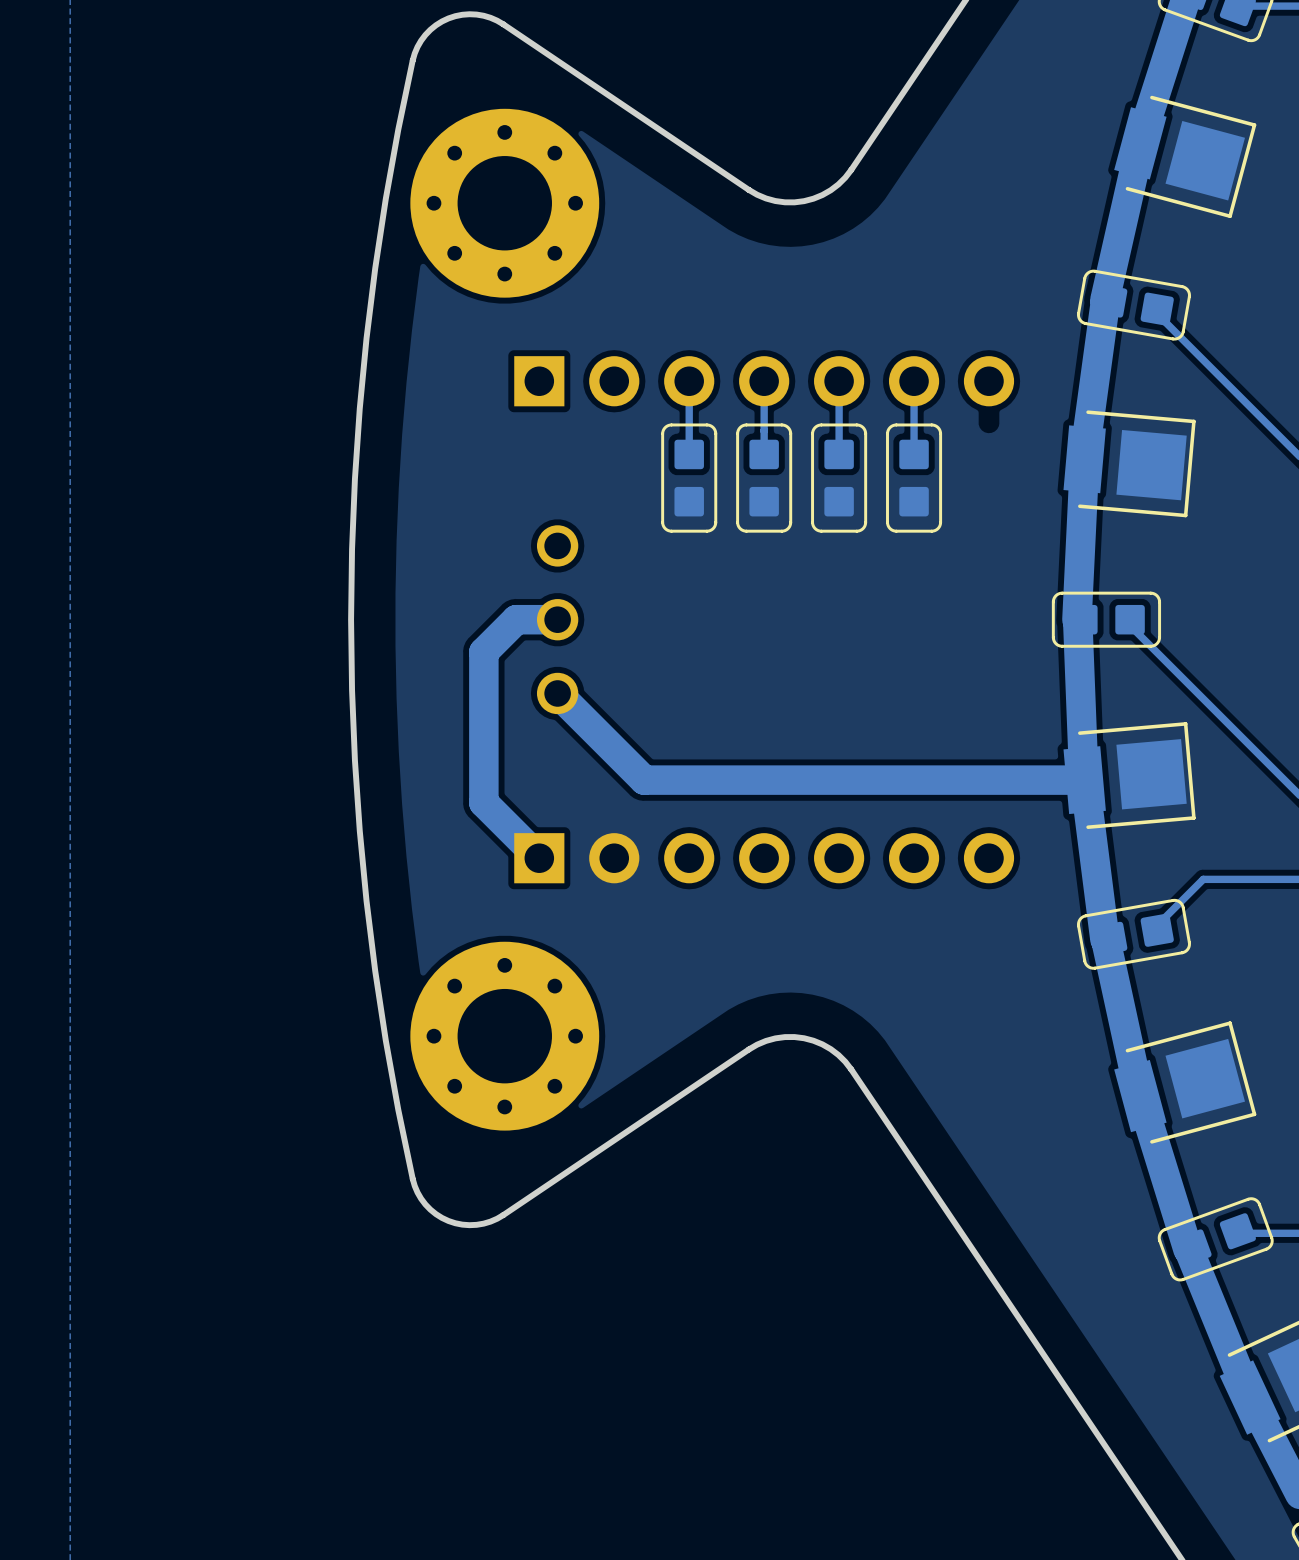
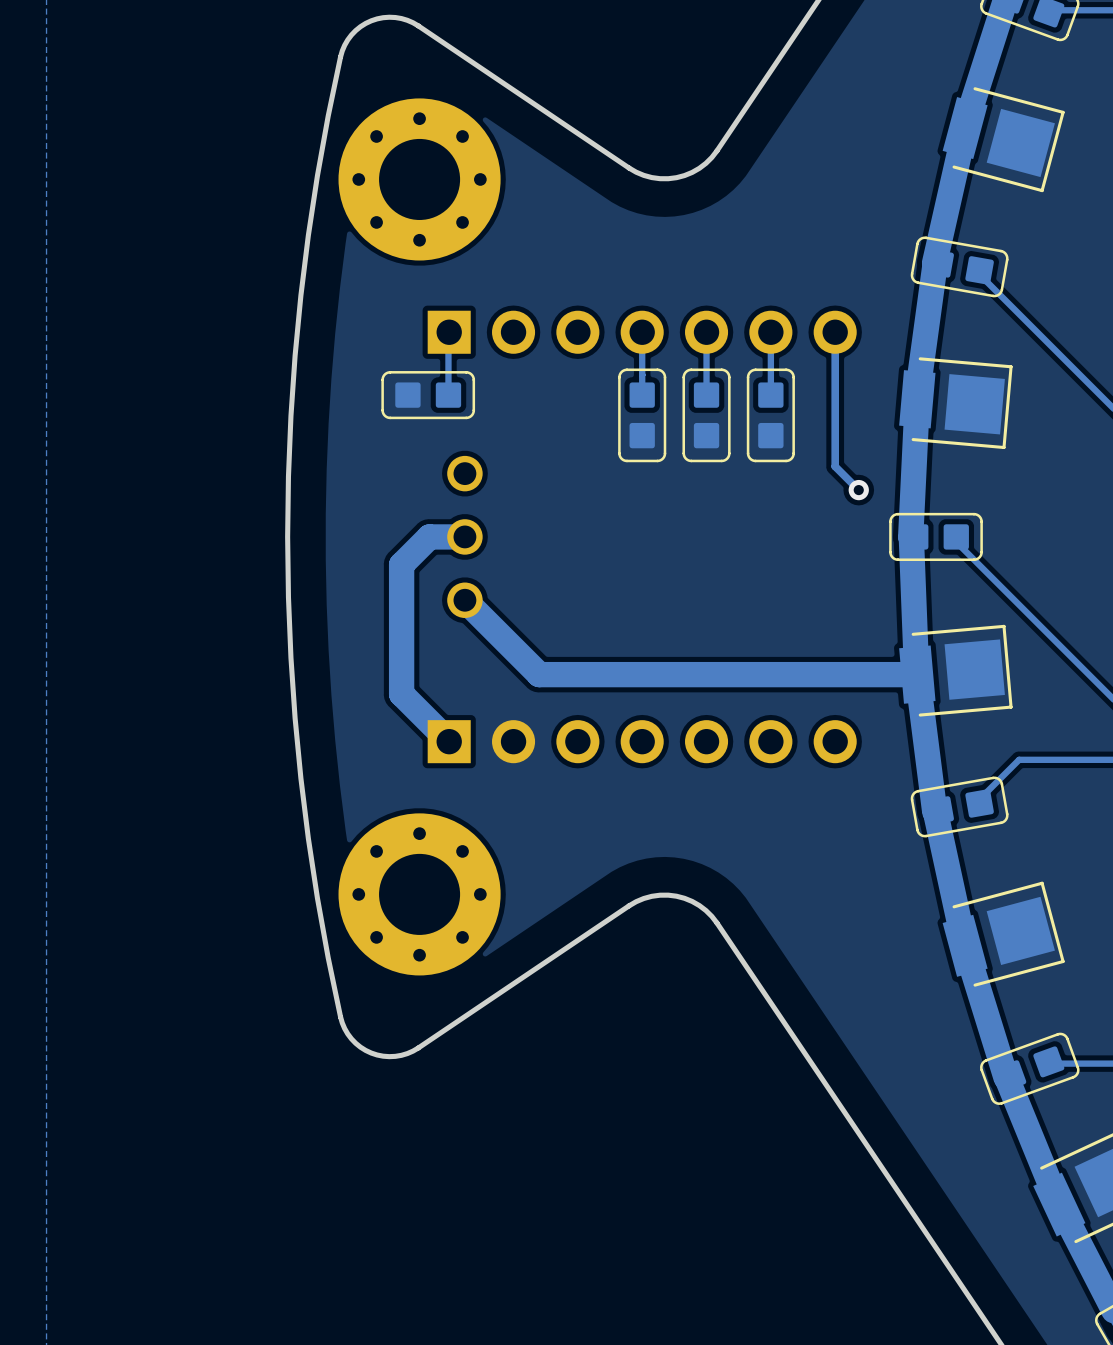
track: (689, 381) (689, 454) -> (448, 332) (448, 395)
track: none -> (835, 332) (835, 466) (858, 490)
part rotation: 0° (689, 478) -> 90° clockwise (428, 395)
part position: (689, 478) -> (428, 395)
via: none -> (858, 490)

